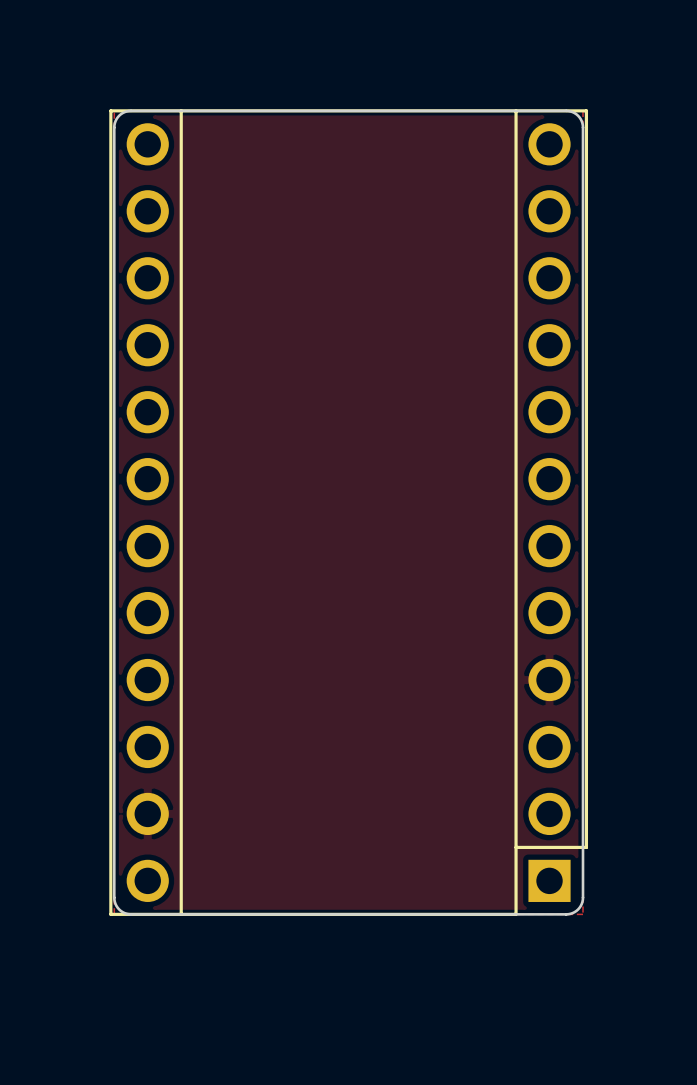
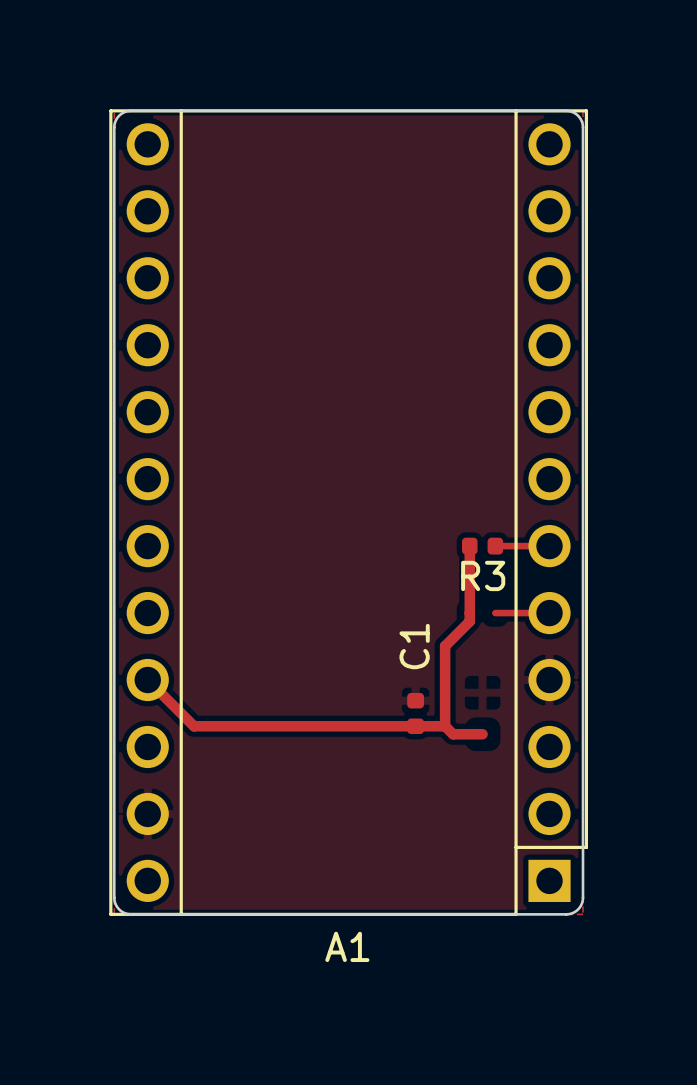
track: none -> (469, 546) (469, 621) (445, 646) (445, 726)
R3: none -> (482, 546)
track: none -> (495, 546) (549, 546)
track: none -> (495, 613) (549, 613)
track: none -> (147, 680) (194, 726) (445, 726)
C1: none -> (415, 713)
track: none -> (445, 726) (453, 734) (482, 734)
A1 name: none -> A1 (347, 946)

